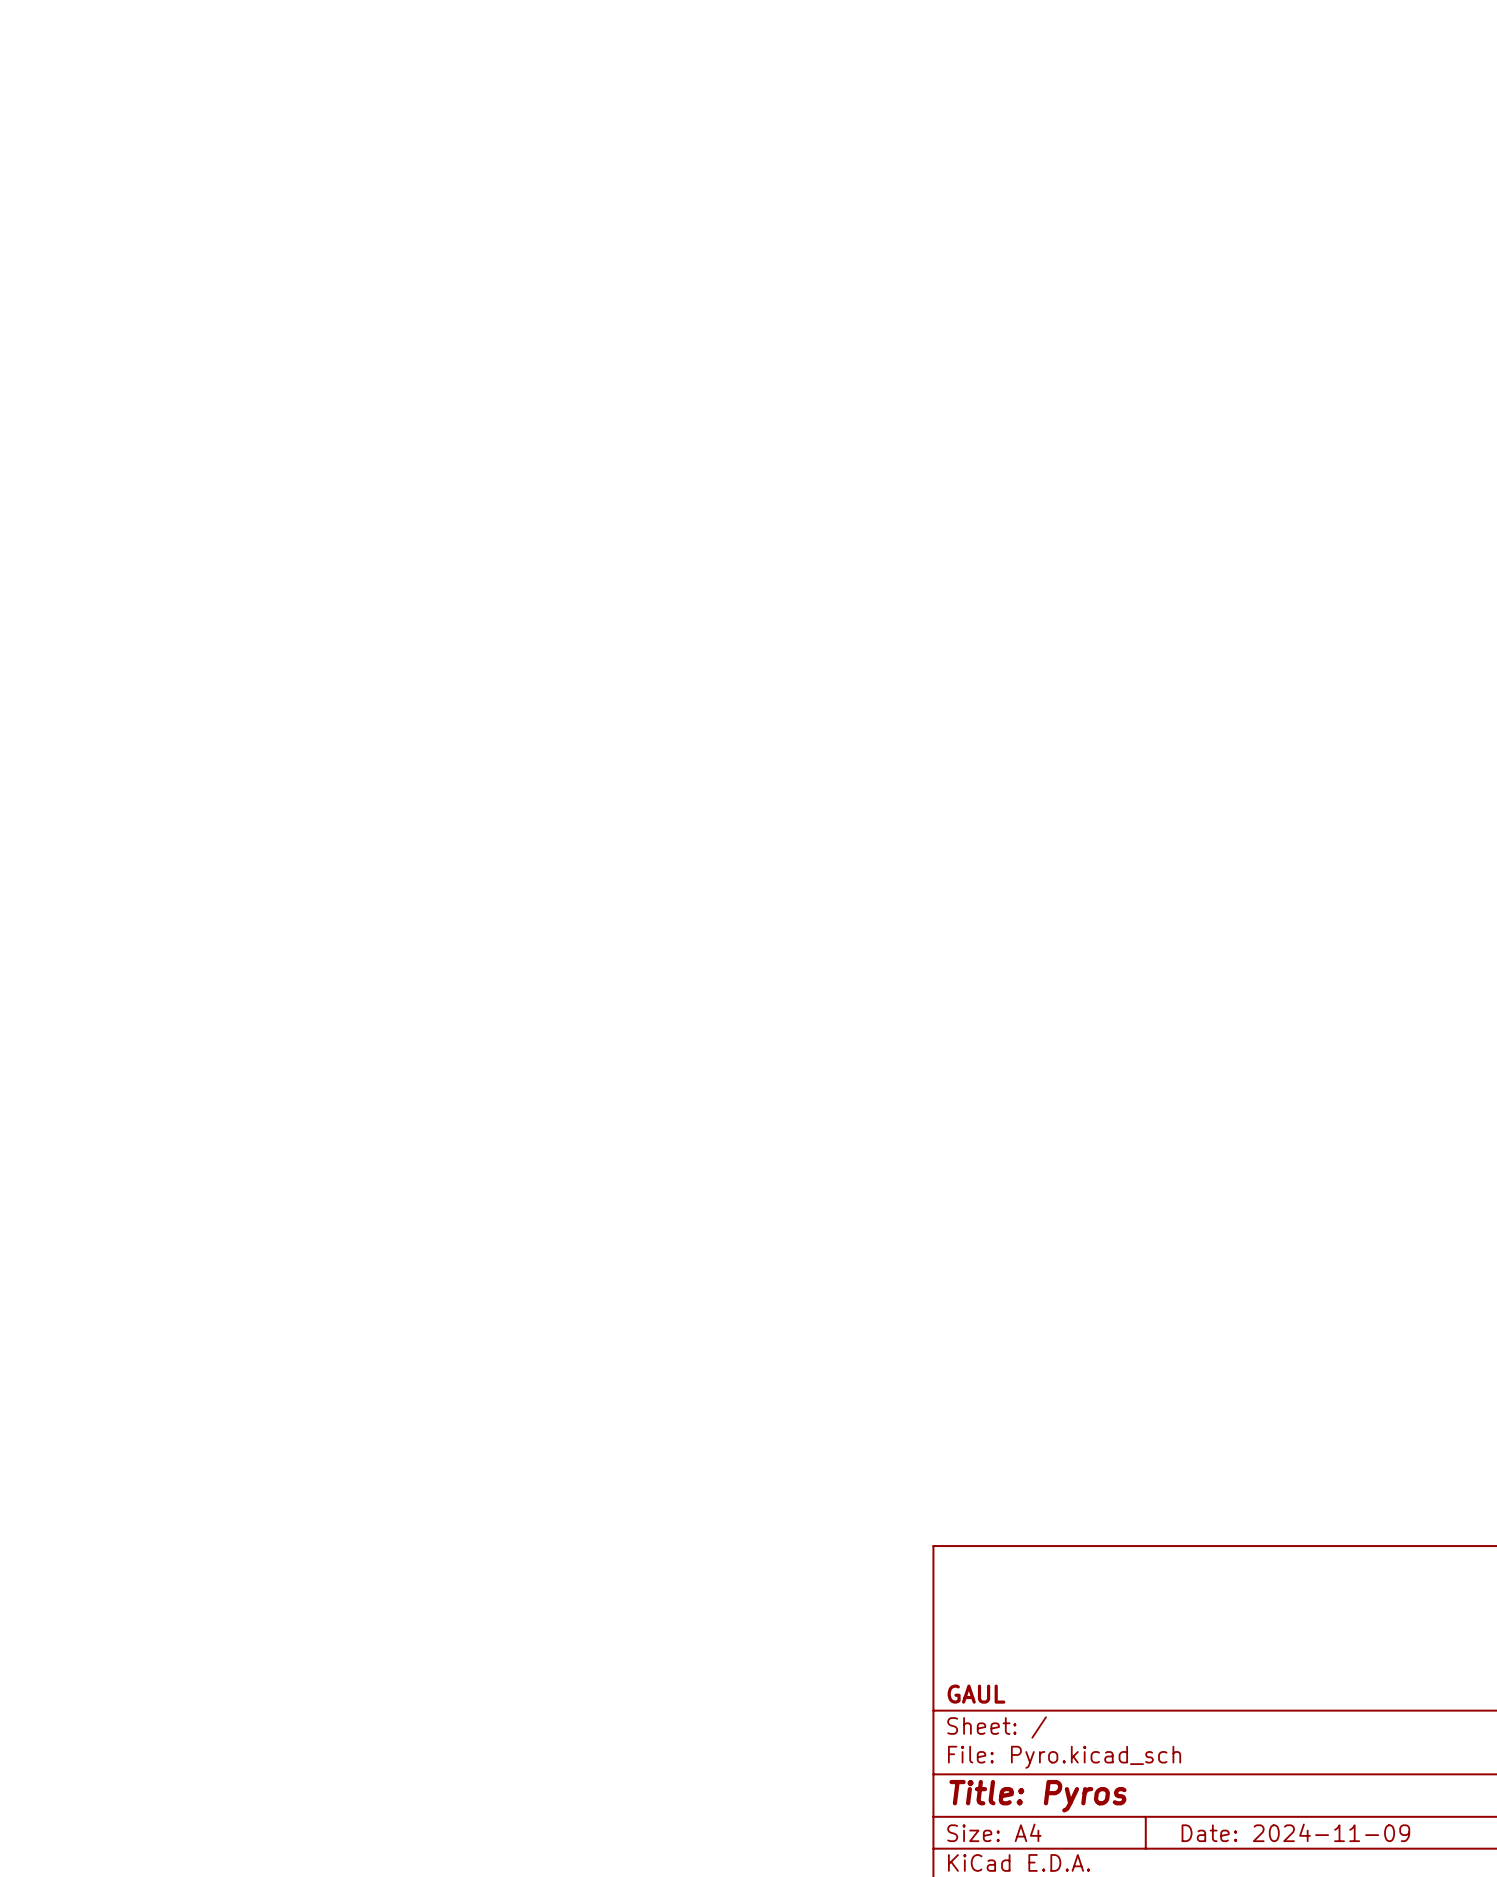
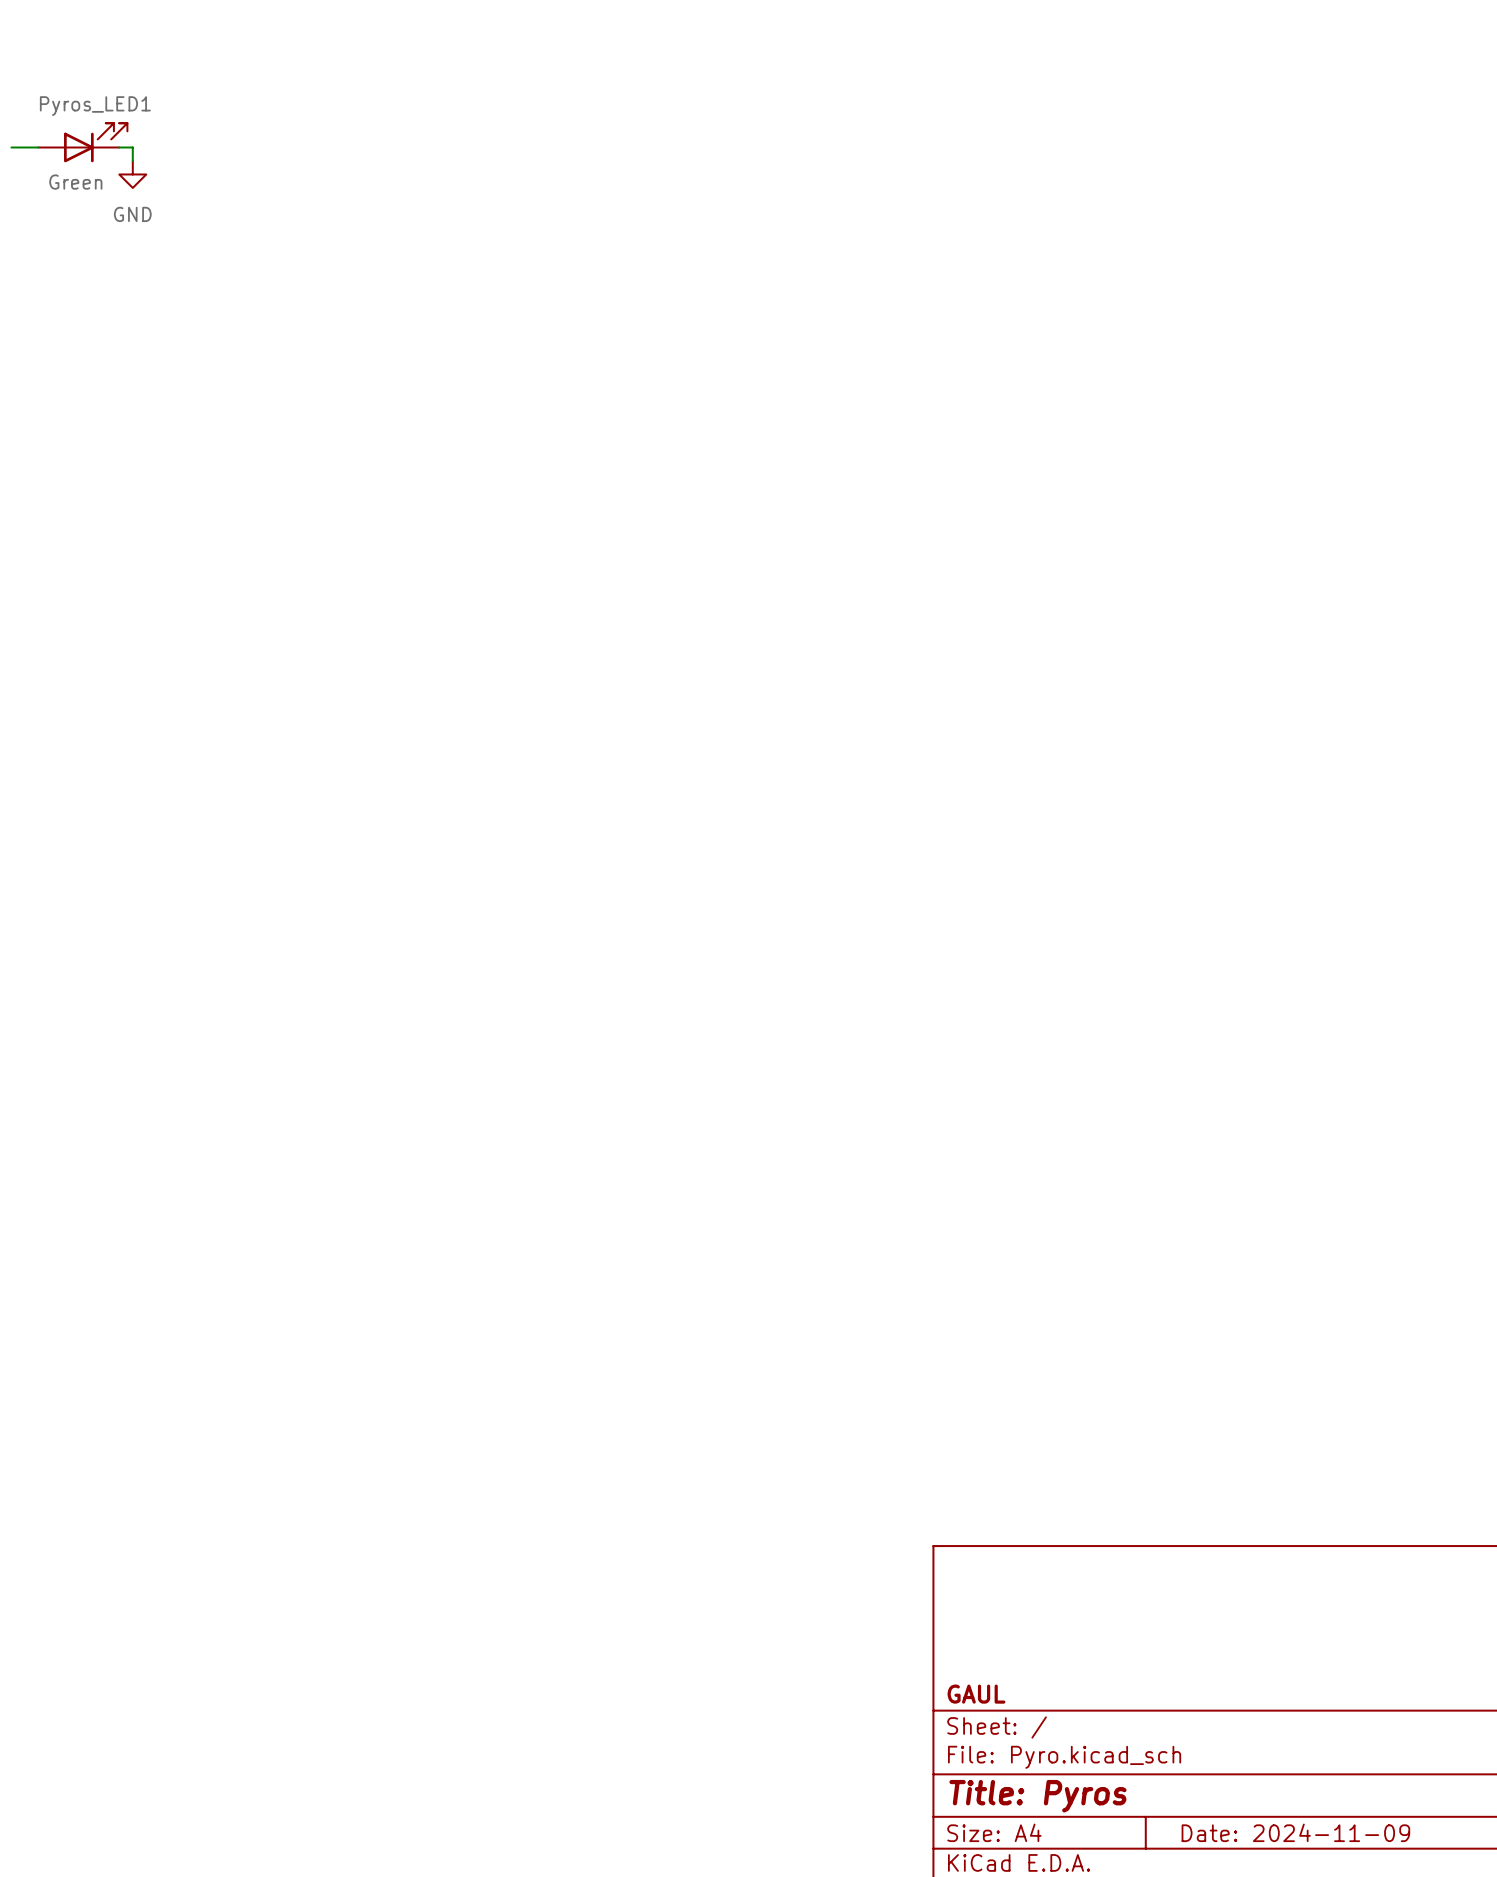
Pyros_LED1: none -> Green (82, 142)
wire: none -> (11, 147) (38, 147)
wire: none -> (119, 147) (132, 147) (132, 160)
power symbol: none -> GND (132, 174)

